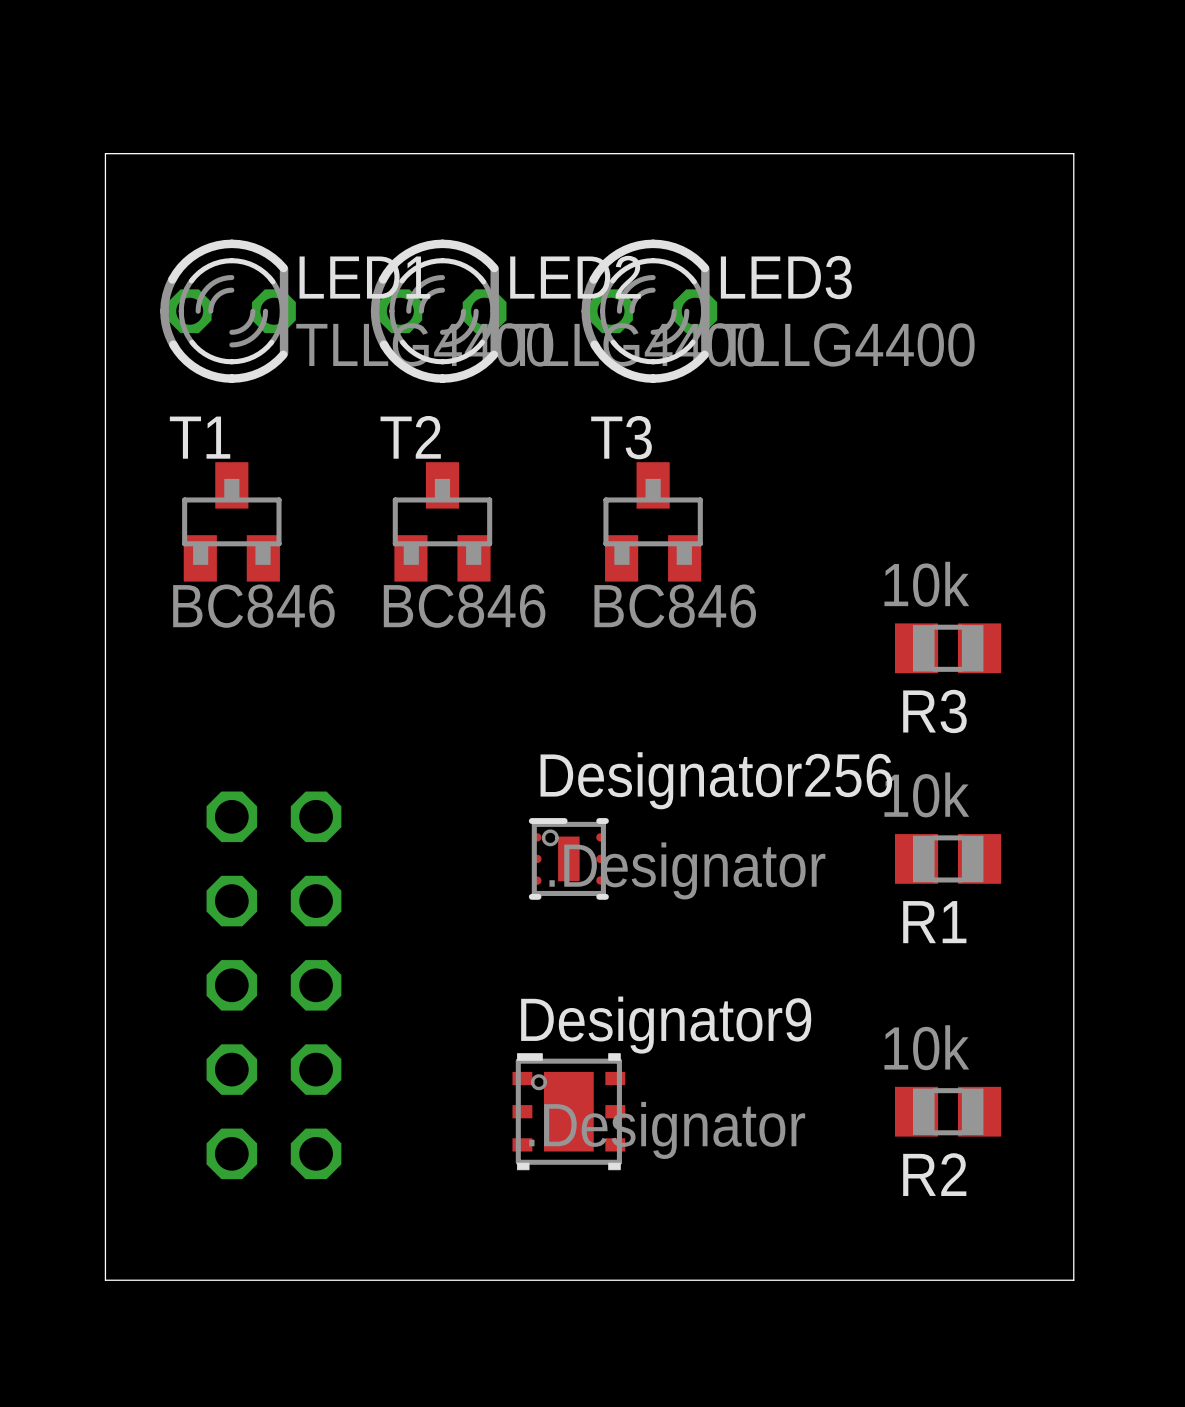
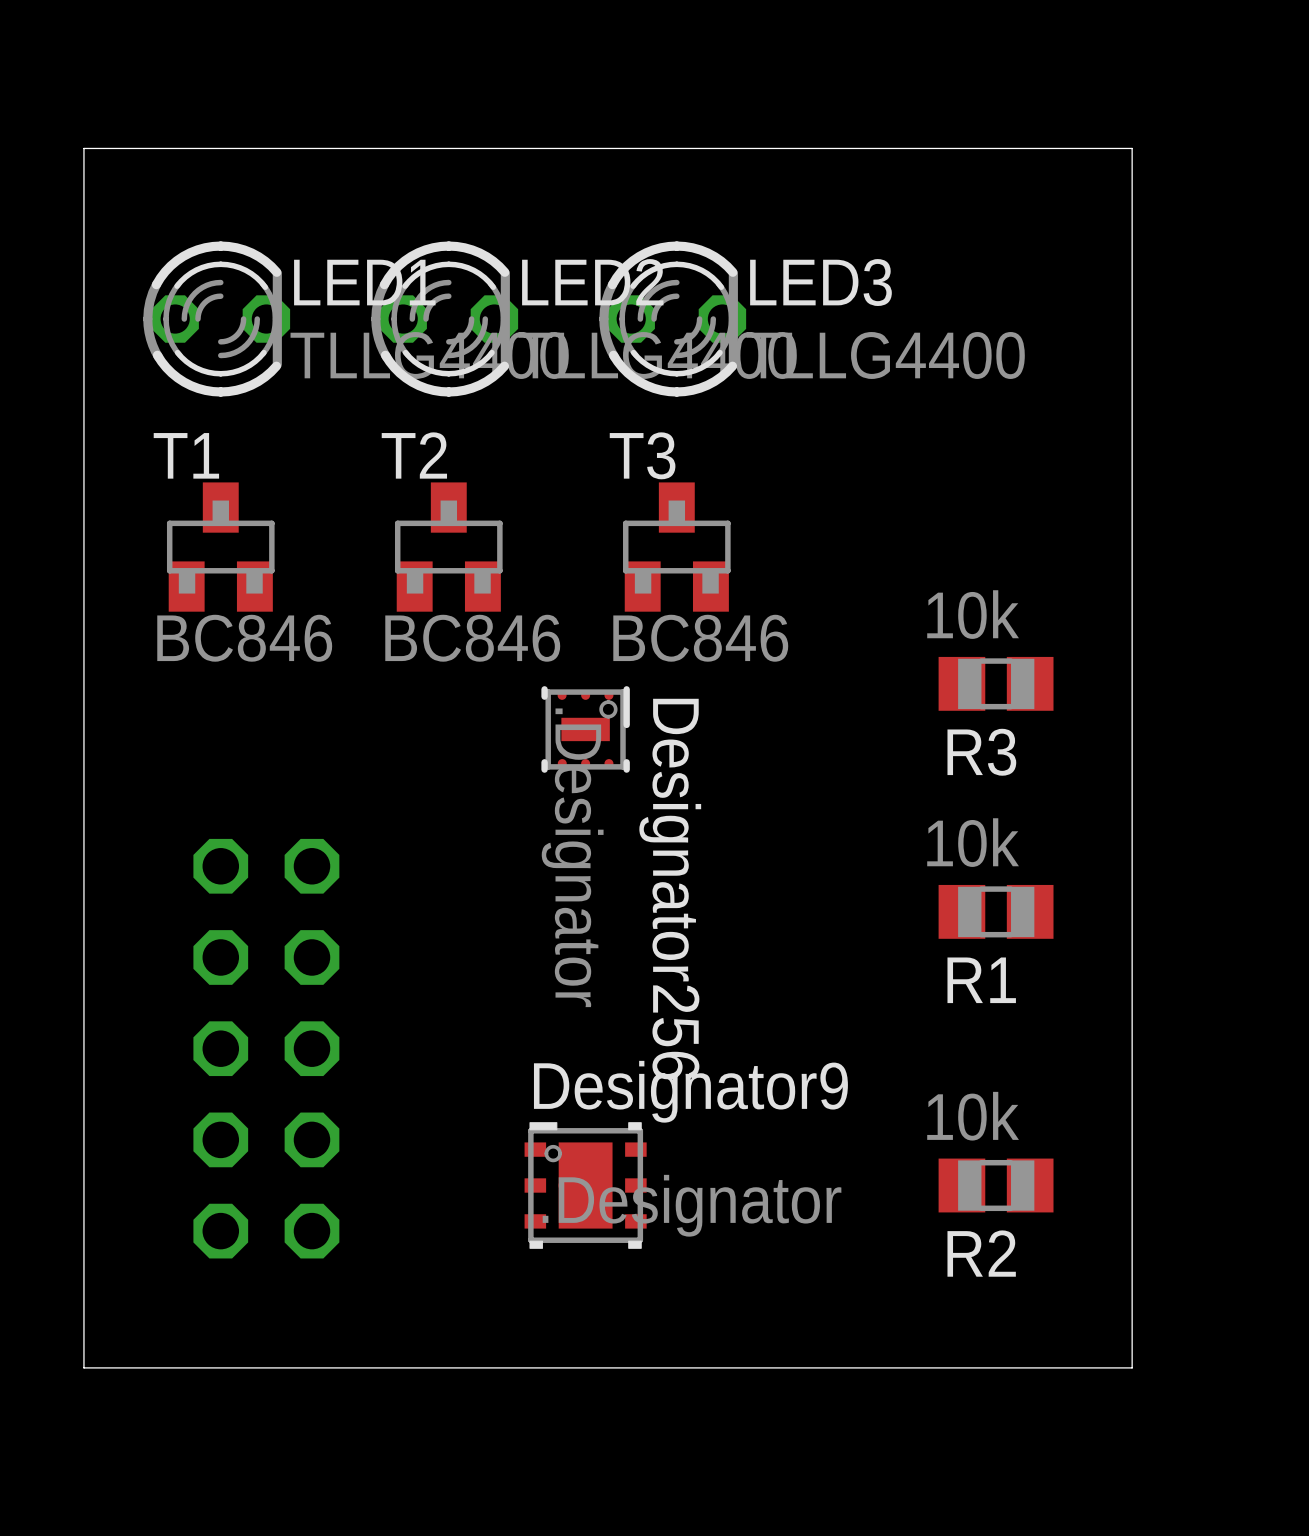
part rotation: 0° (568, 858) -> 90° clockwise (585, 729)
part position: (568, 858) -> (585, 729)

